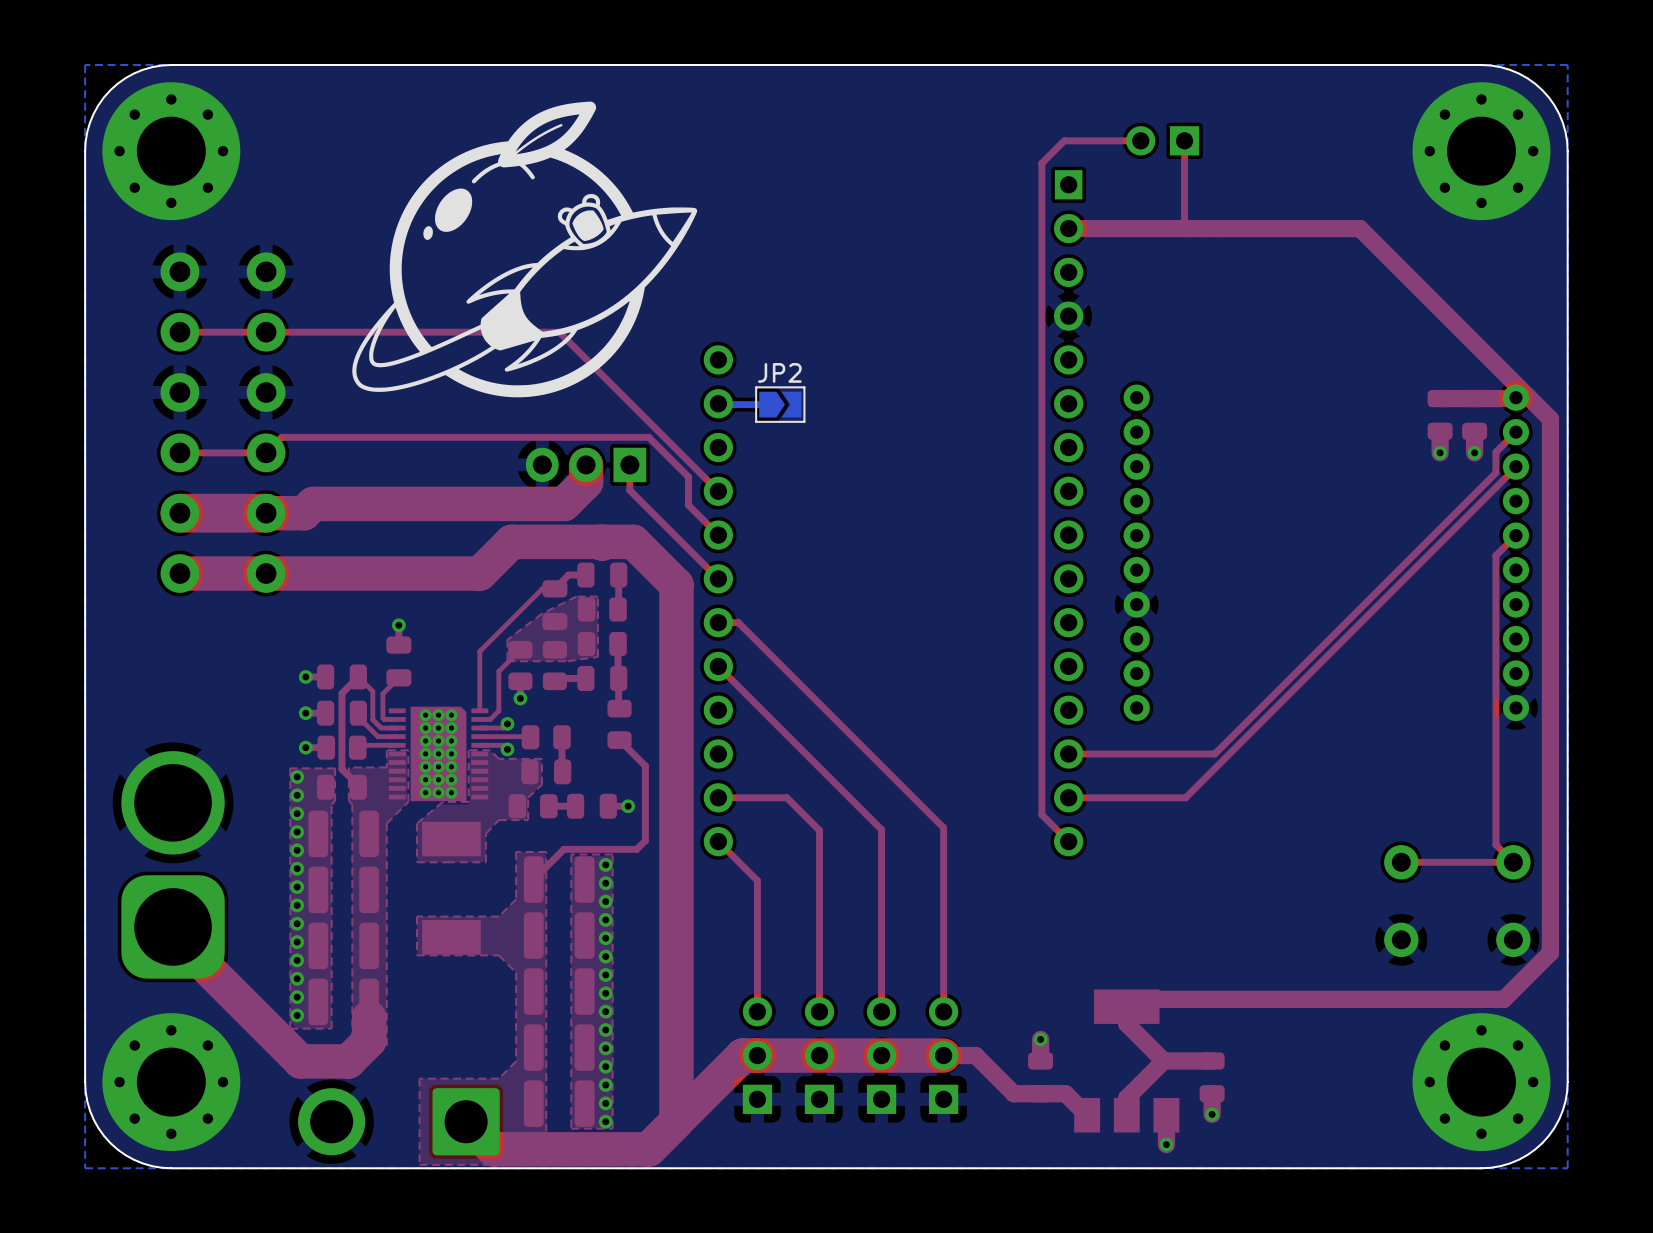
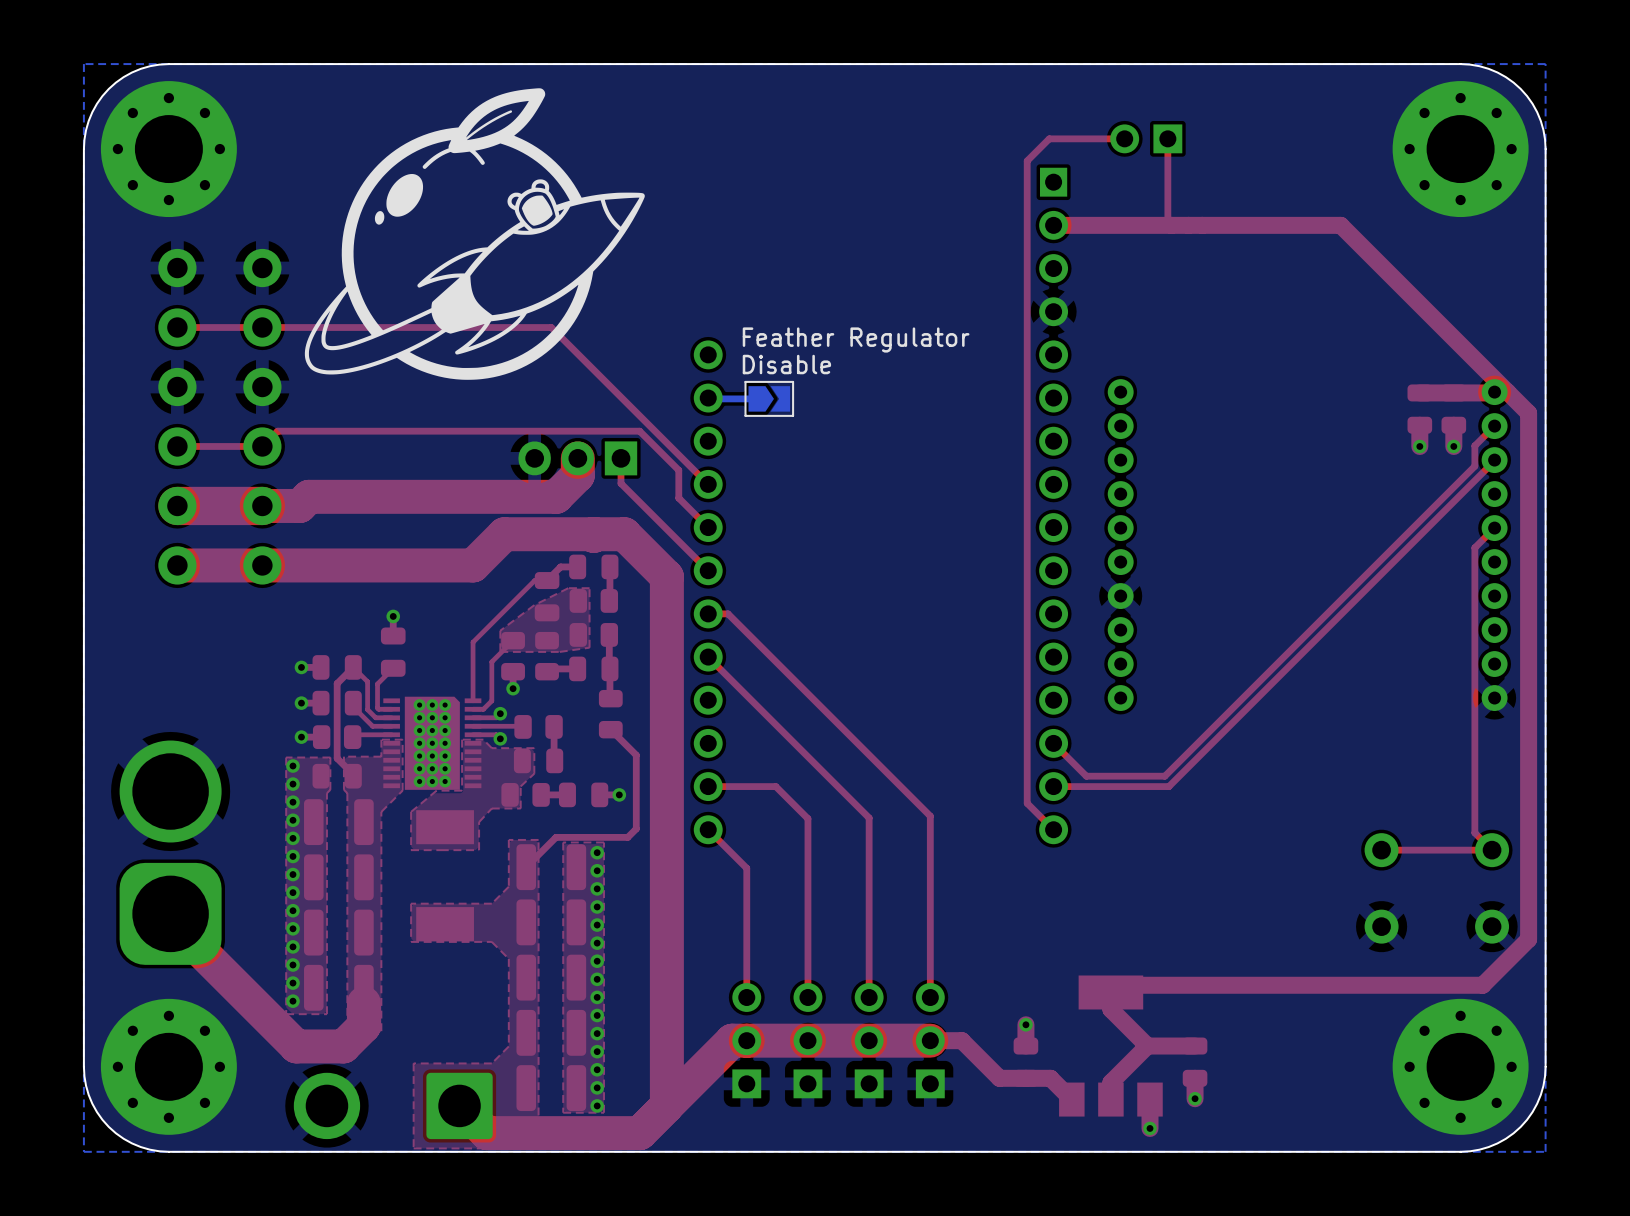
drawing position: (524, 249) -> (474, 234)
text: none -> Feather Regulator (856, 339)
text: none -> Disable (786, 364)
JP2 name: JP2 (779, 372) -> none
top track: (1214, 754) (1068, 754) -> (1197, 743) (1164, 776) (1086, 776) (1053, 743)

